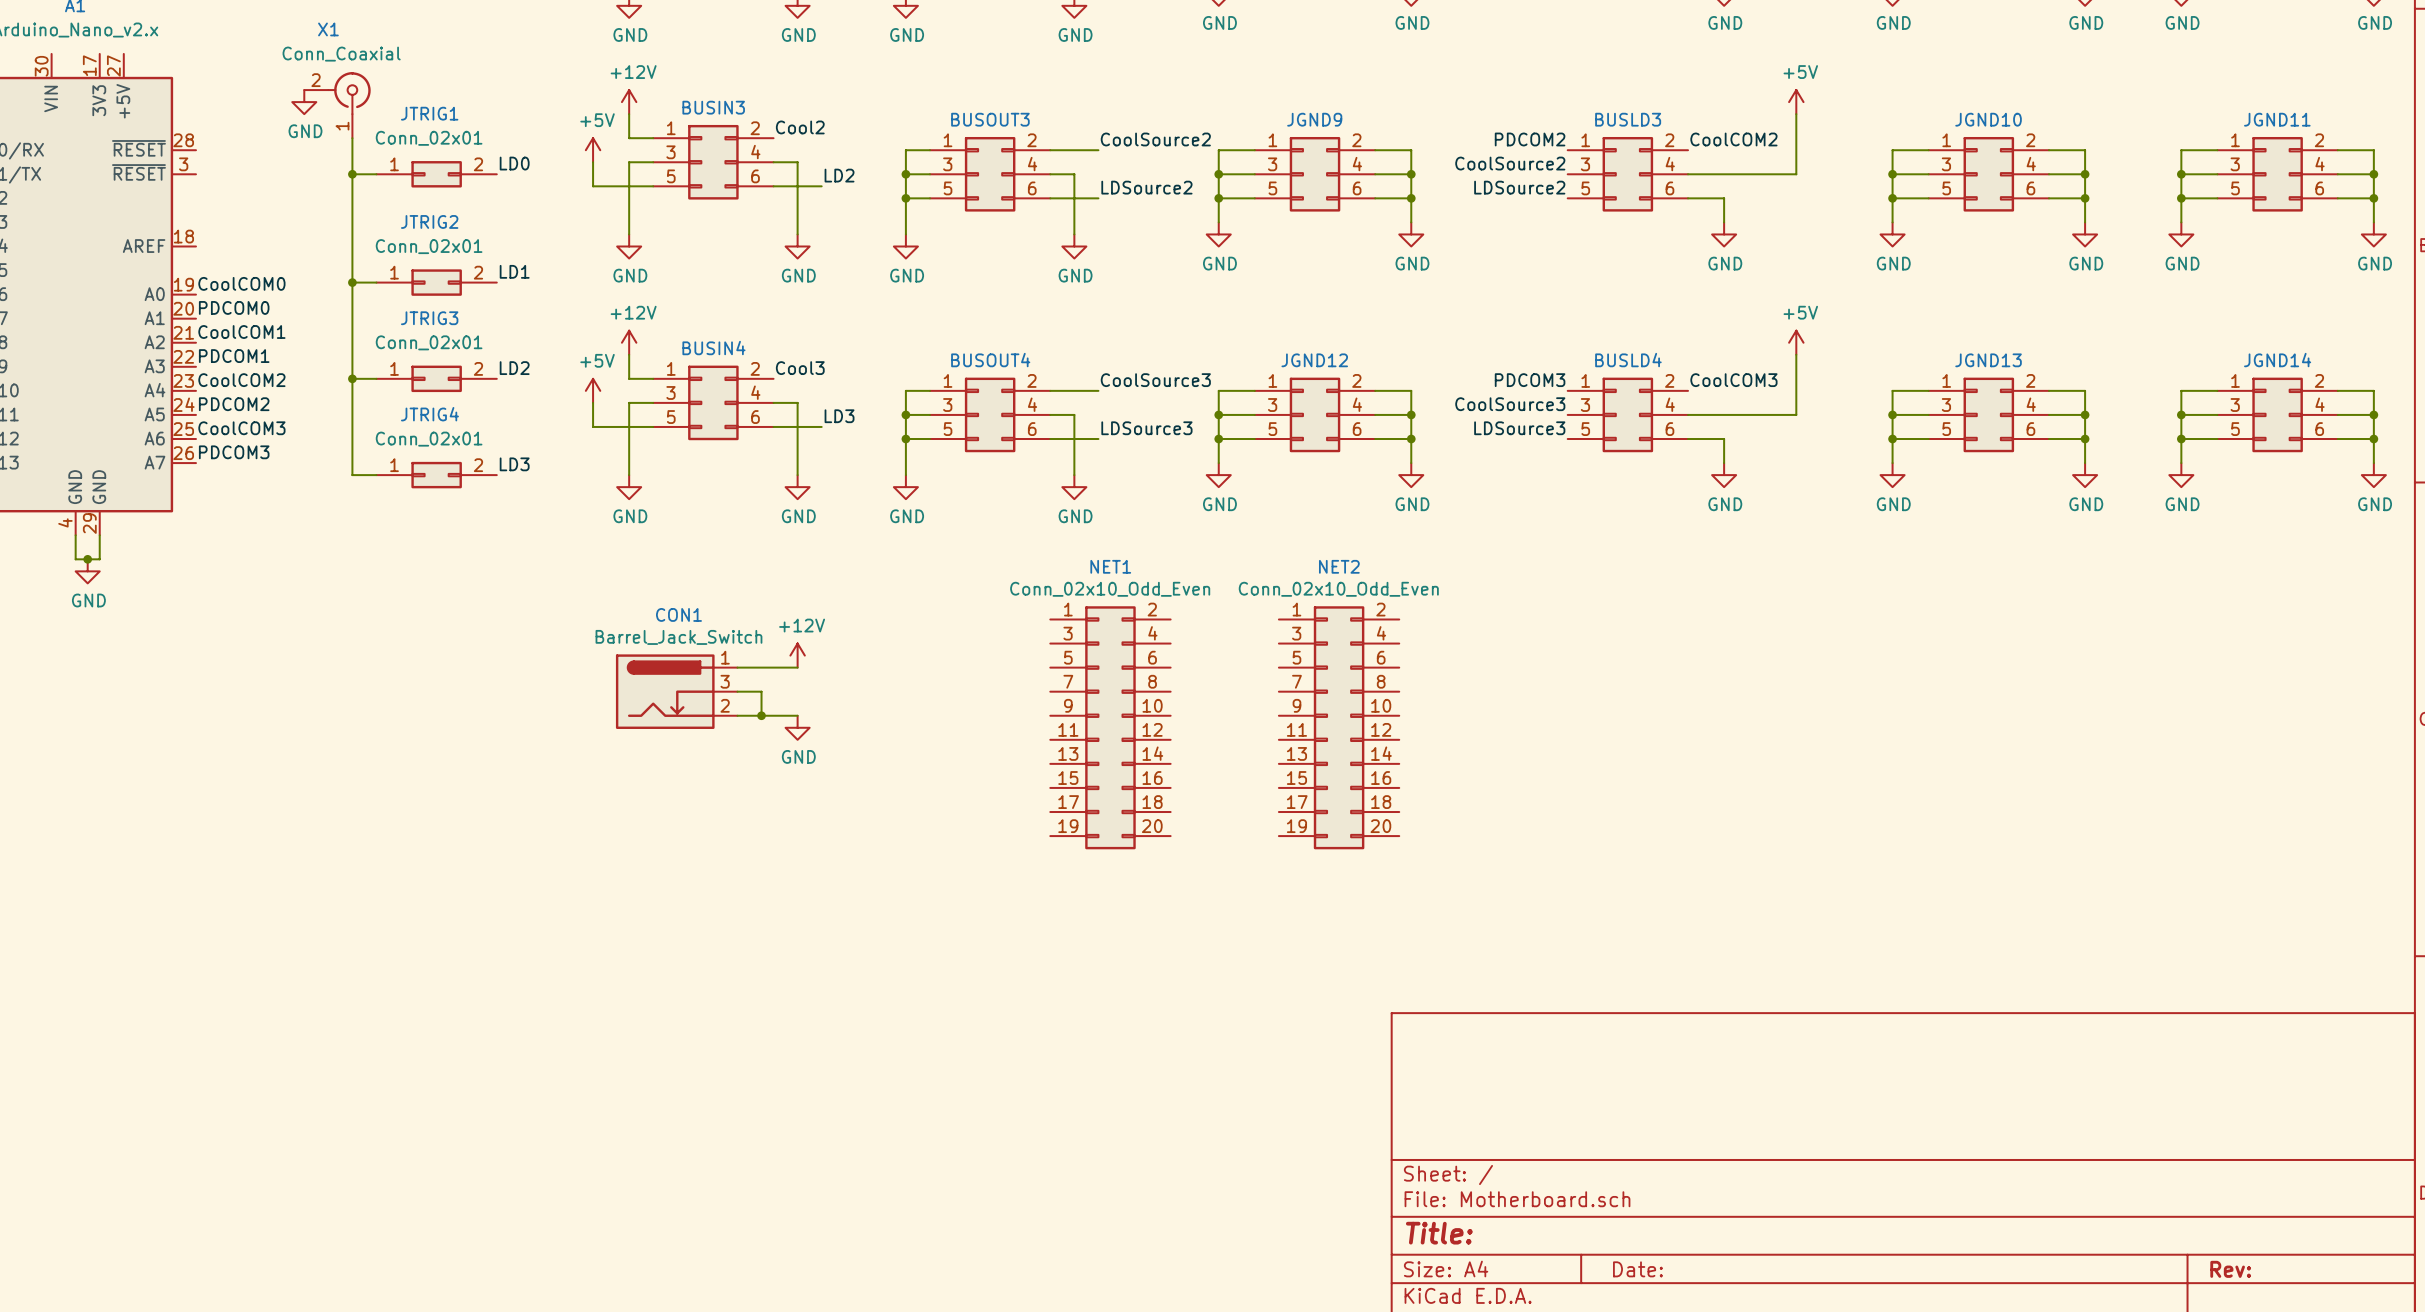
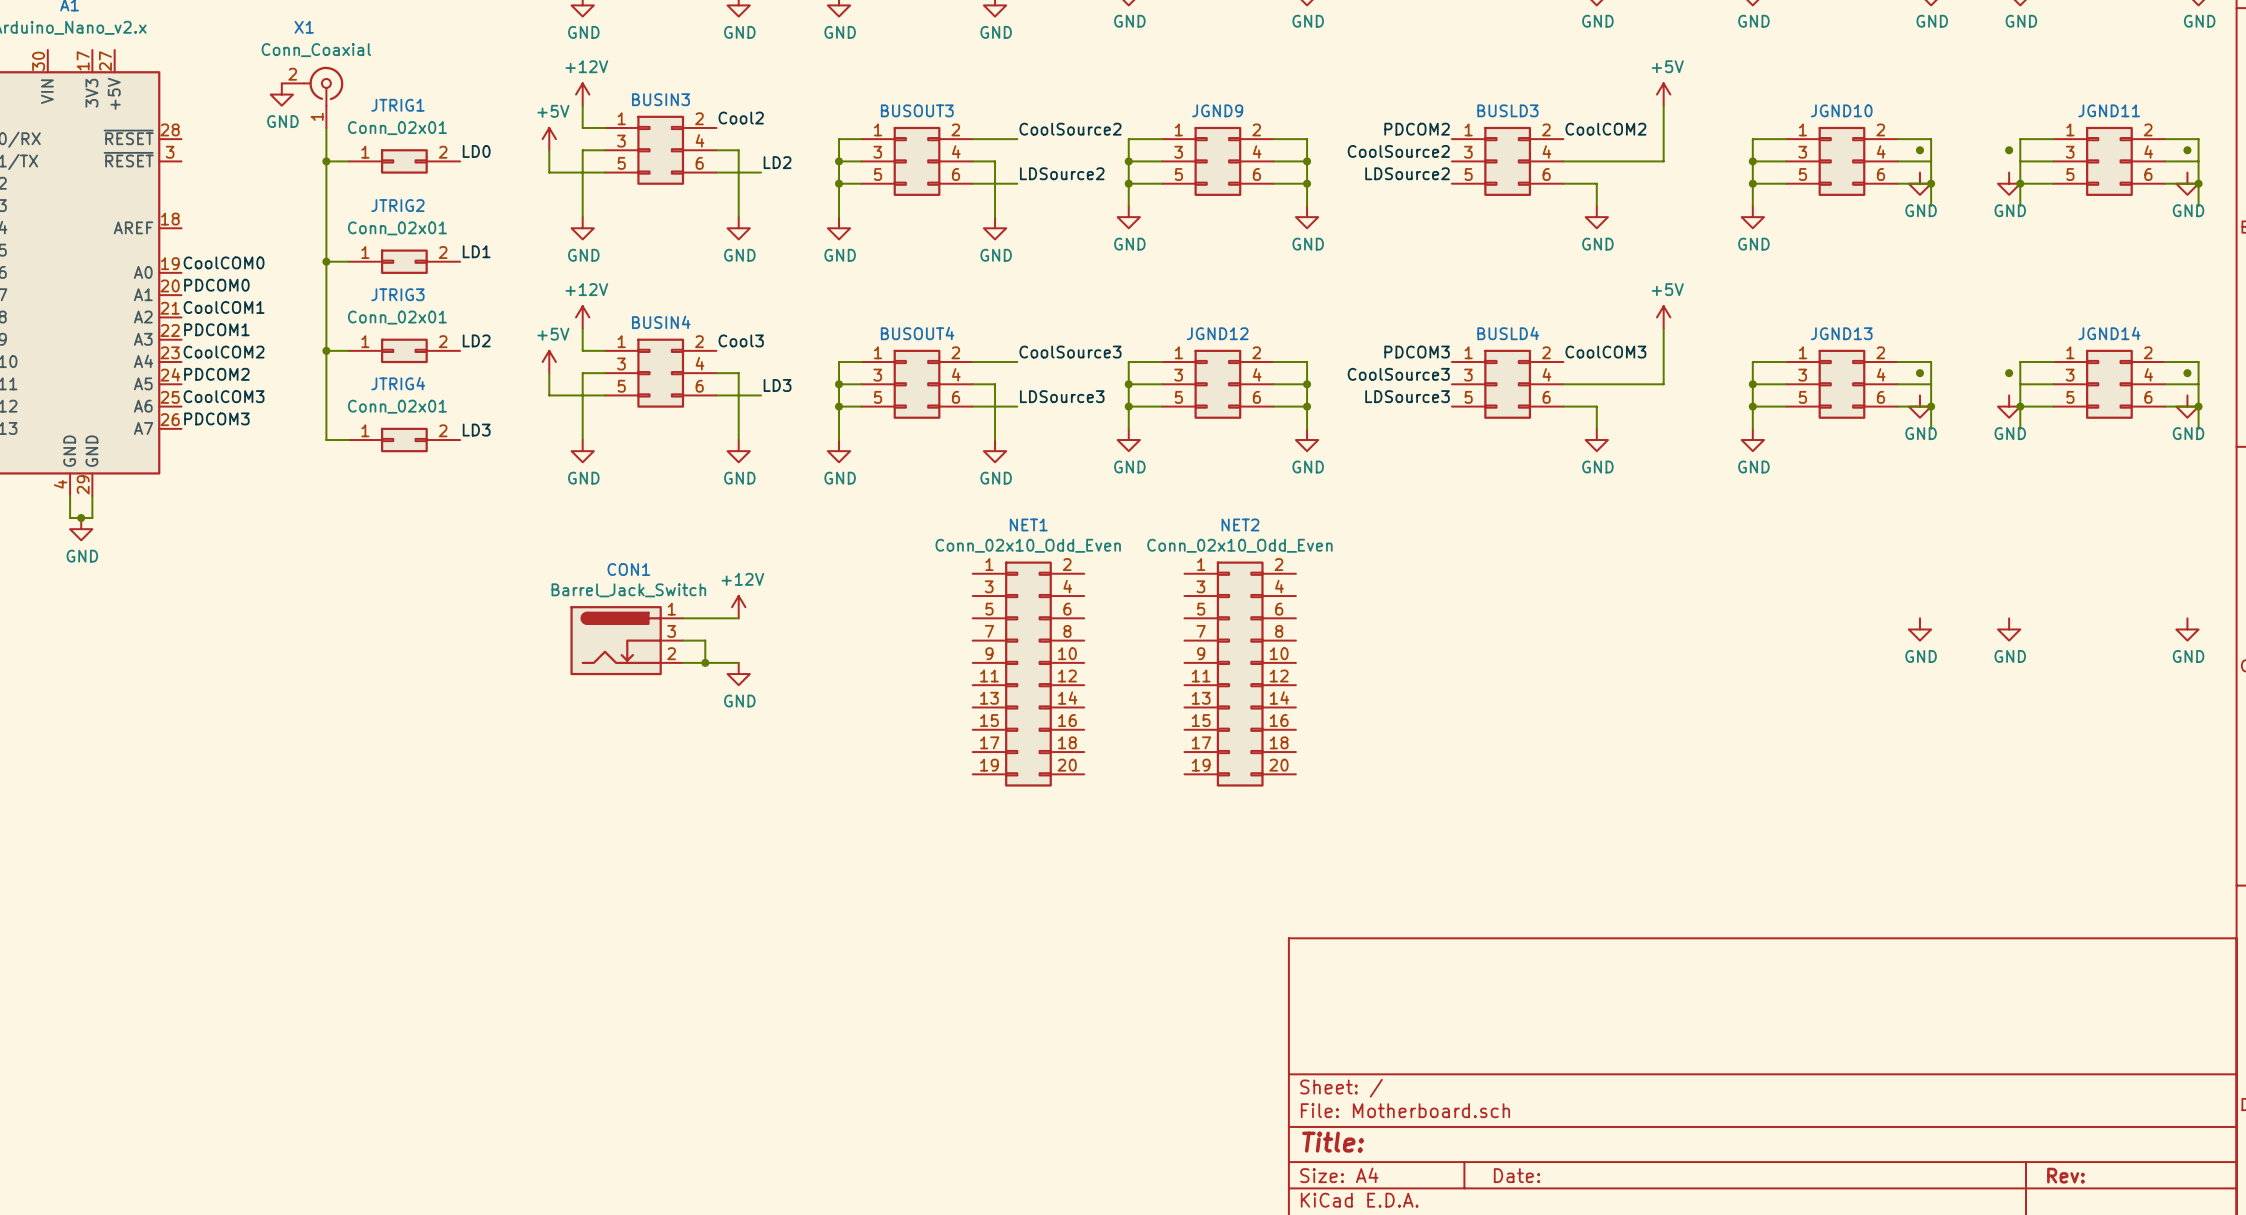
junction position: (2085, 174) -> (1919, 150)
junction position: (2181, 174) -> (2009, 150)
junction position: (2373, 174) -> (2187, 150)
power symbol position: GND (2085, 234) -> GND (1919, 183)
power symbol position: GND (2181, 234) -> GND (2009, 183)
power symbol position: GND (2373, 234) -> GND (2187, 183)
junction position: (2085, 414) -> (1919, 373)
junction position: (2181, 414) -> (2009, 373)
junction position: (2373, 414) -> (2187, 373)
power symbol position: GND (2085, 475) -> GND (1919, 406)
power symbol position: GND (2181, 475) -> GND (2009, 406)
power symbol position: GND (2373, 475) -> GND (2187, 406)
power symbol: none -> GND (1919, 629)
power symbol: none -> GND (2009, 629)
power symbol: none -> GND (2187, 629)

